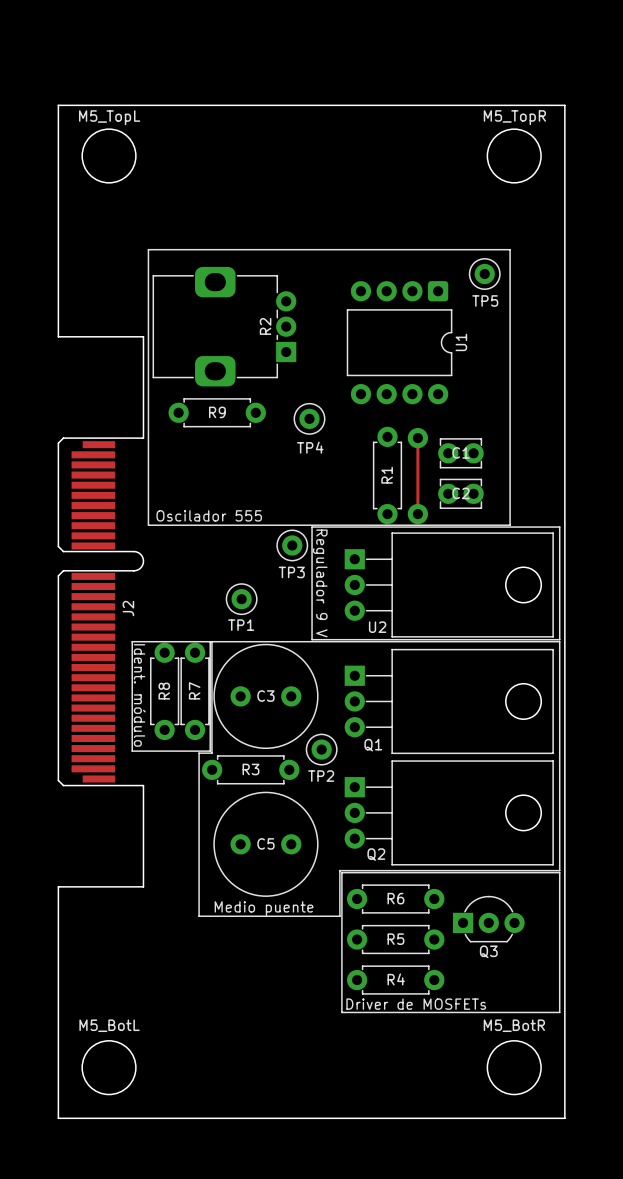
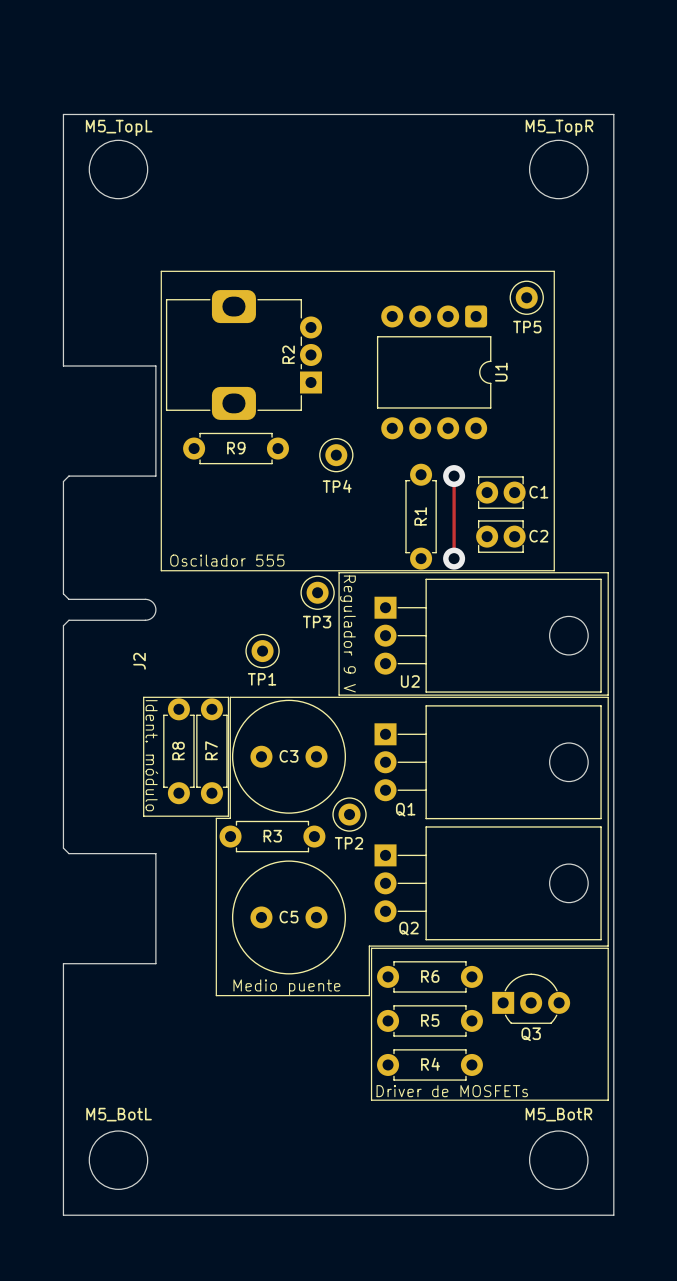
J2 footprint: [57, 437, 144, 787] -> [62, 475, 157, 855]
C1 name position: C1 (460, 452) -> C1 (538, 492)
C2 name position: C2 (460, 493) -> C2 (538, 536)

